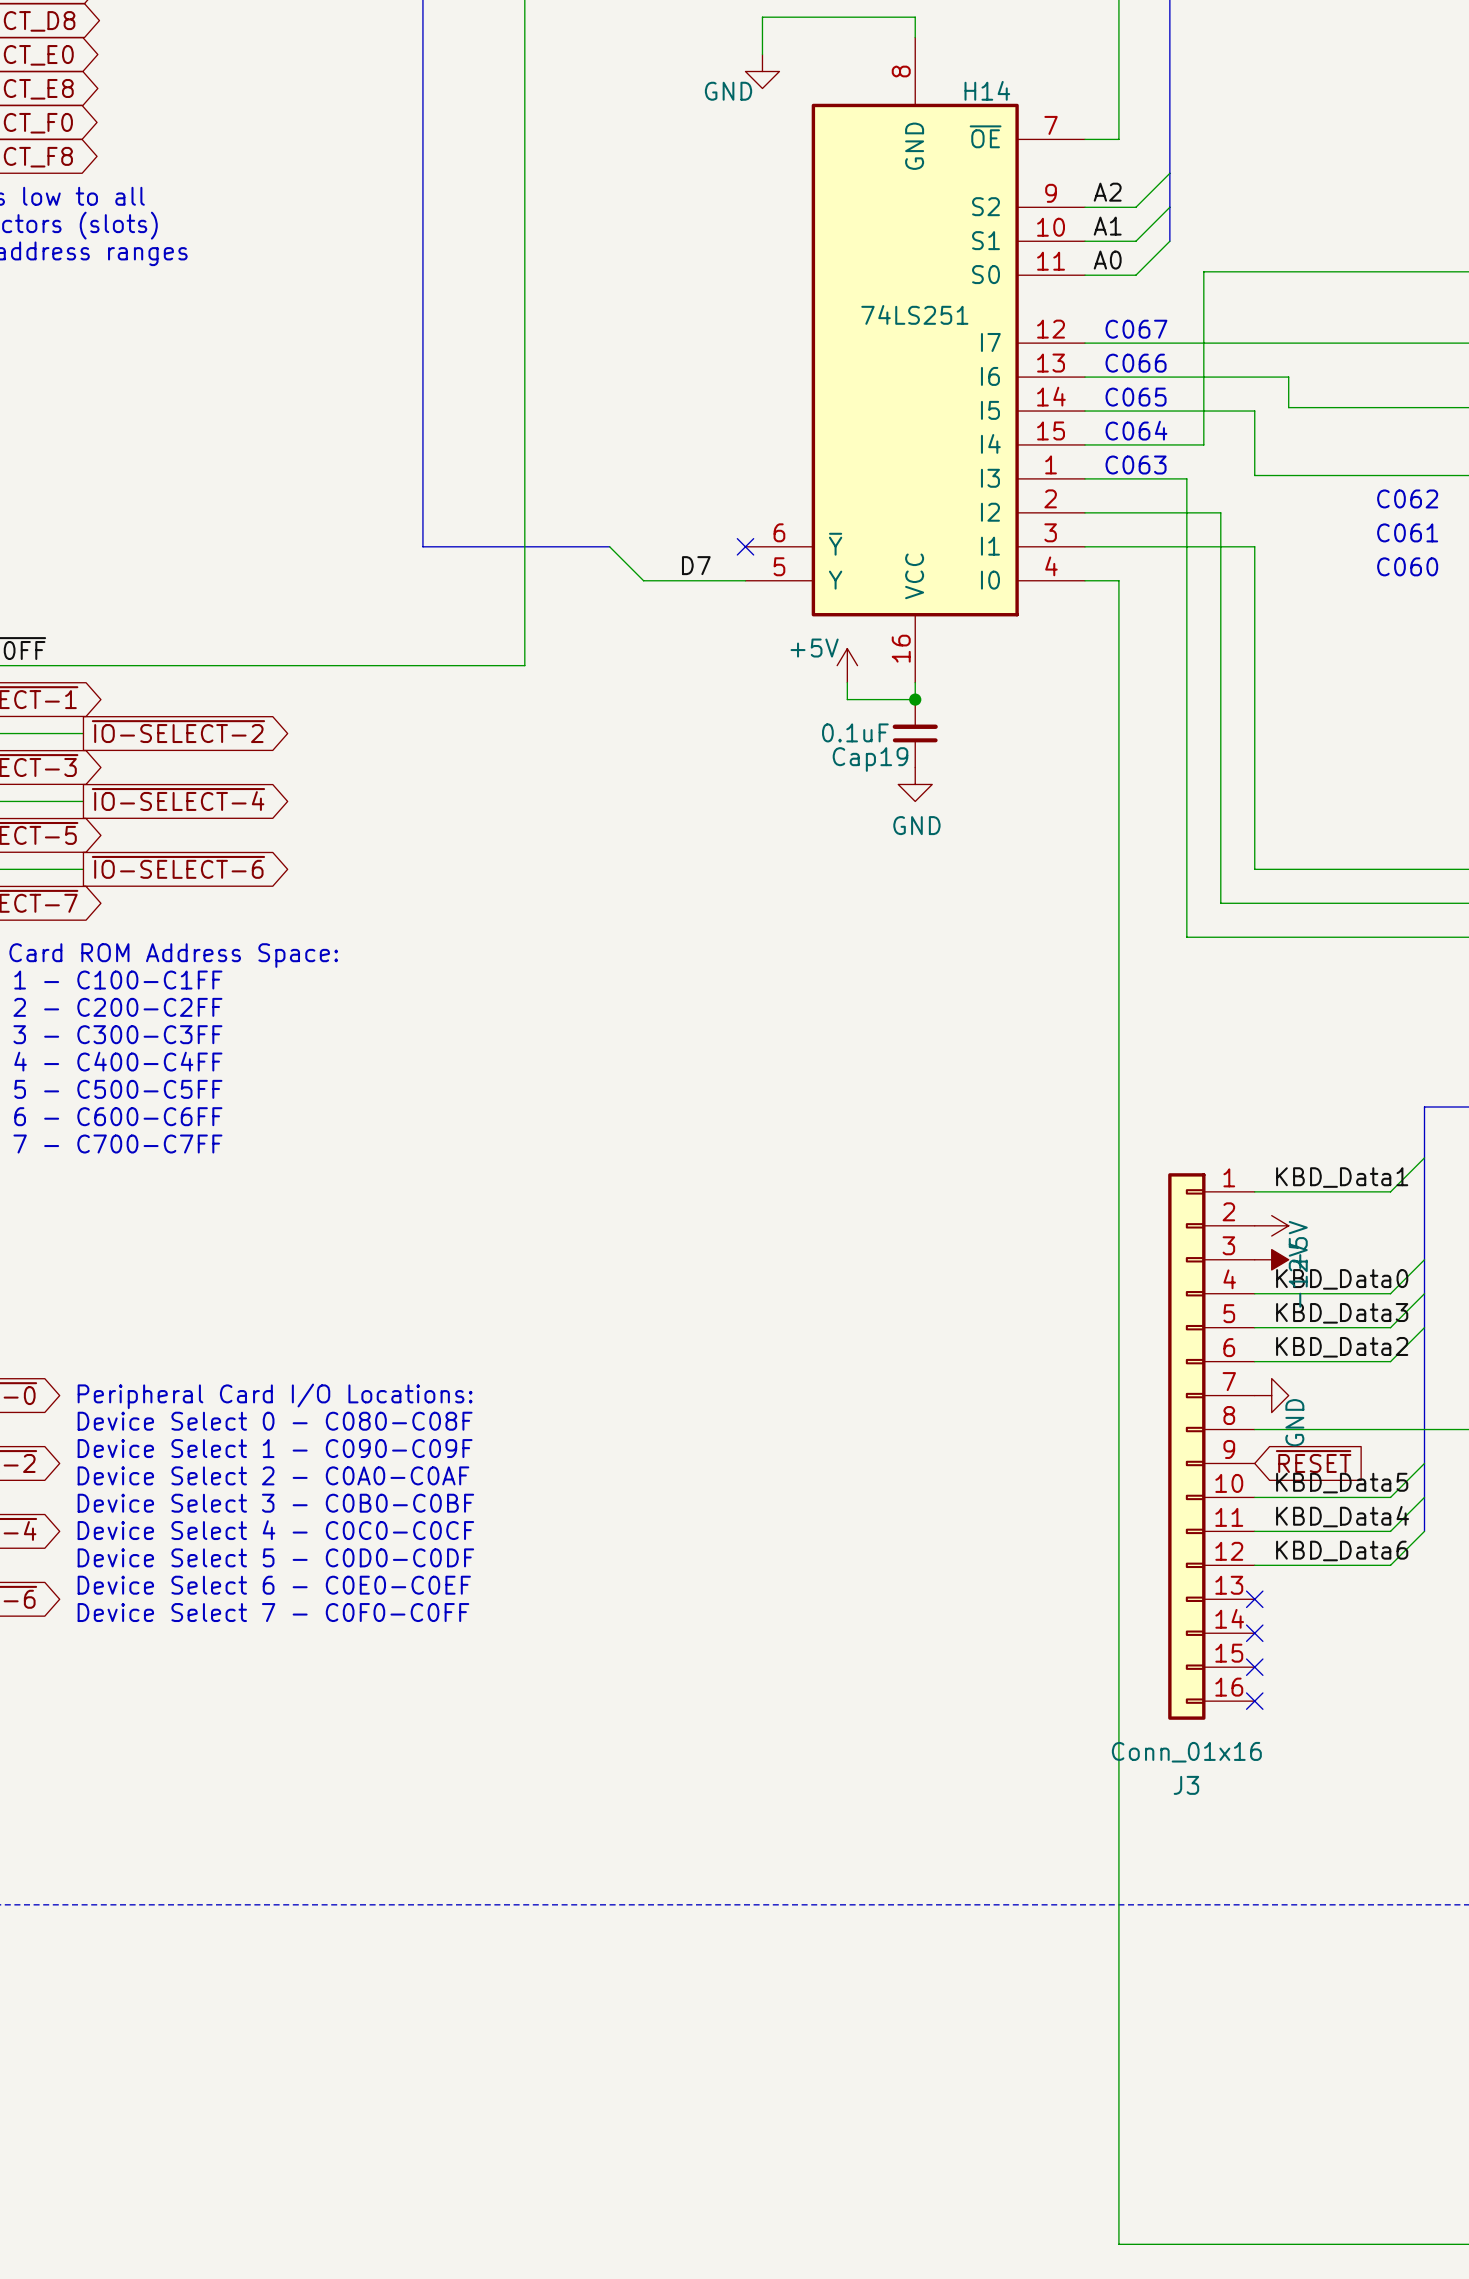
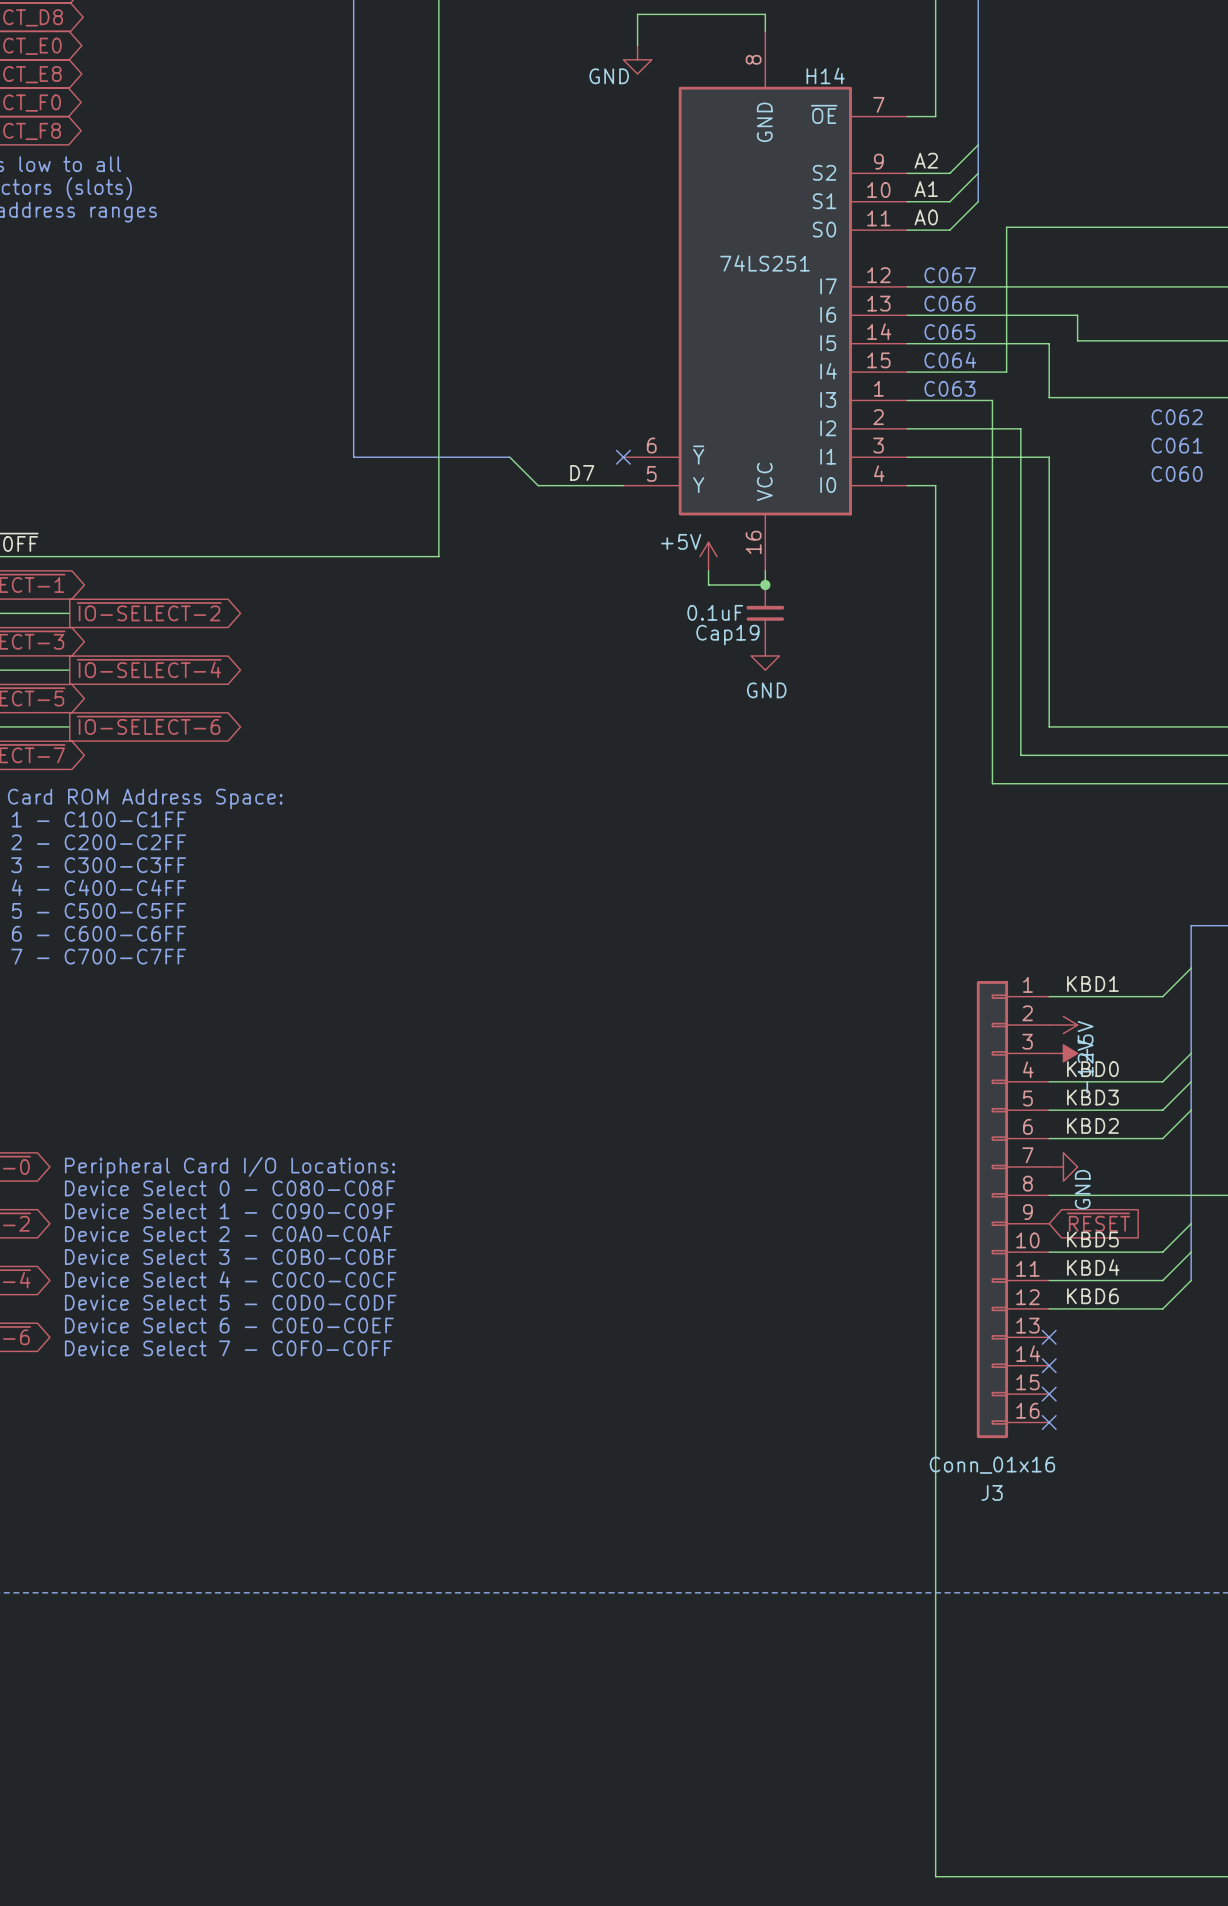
label: KBD_Data1 (1342, 1177) -> KBD1 (1092, 983)
label: KBD_Data0 (1342, 1279) -> KBD0 (1092, 1069)
label: KBD_Data3 (1342, 1313) -> KBD3 (1092, 1097)
label: KBD_Data2 (1342, 1347) -> KBD2 (1092, 1125)
label: KBD_Data5 (1342, 1483) -> KBD5 (1092, 1239)
label: KBD_Data4 (1342, 1516) -> KBD4 (1093, 1267)
label: KBD_Data6 (1342, 1550) -> KBD6 (1092, 1296)

